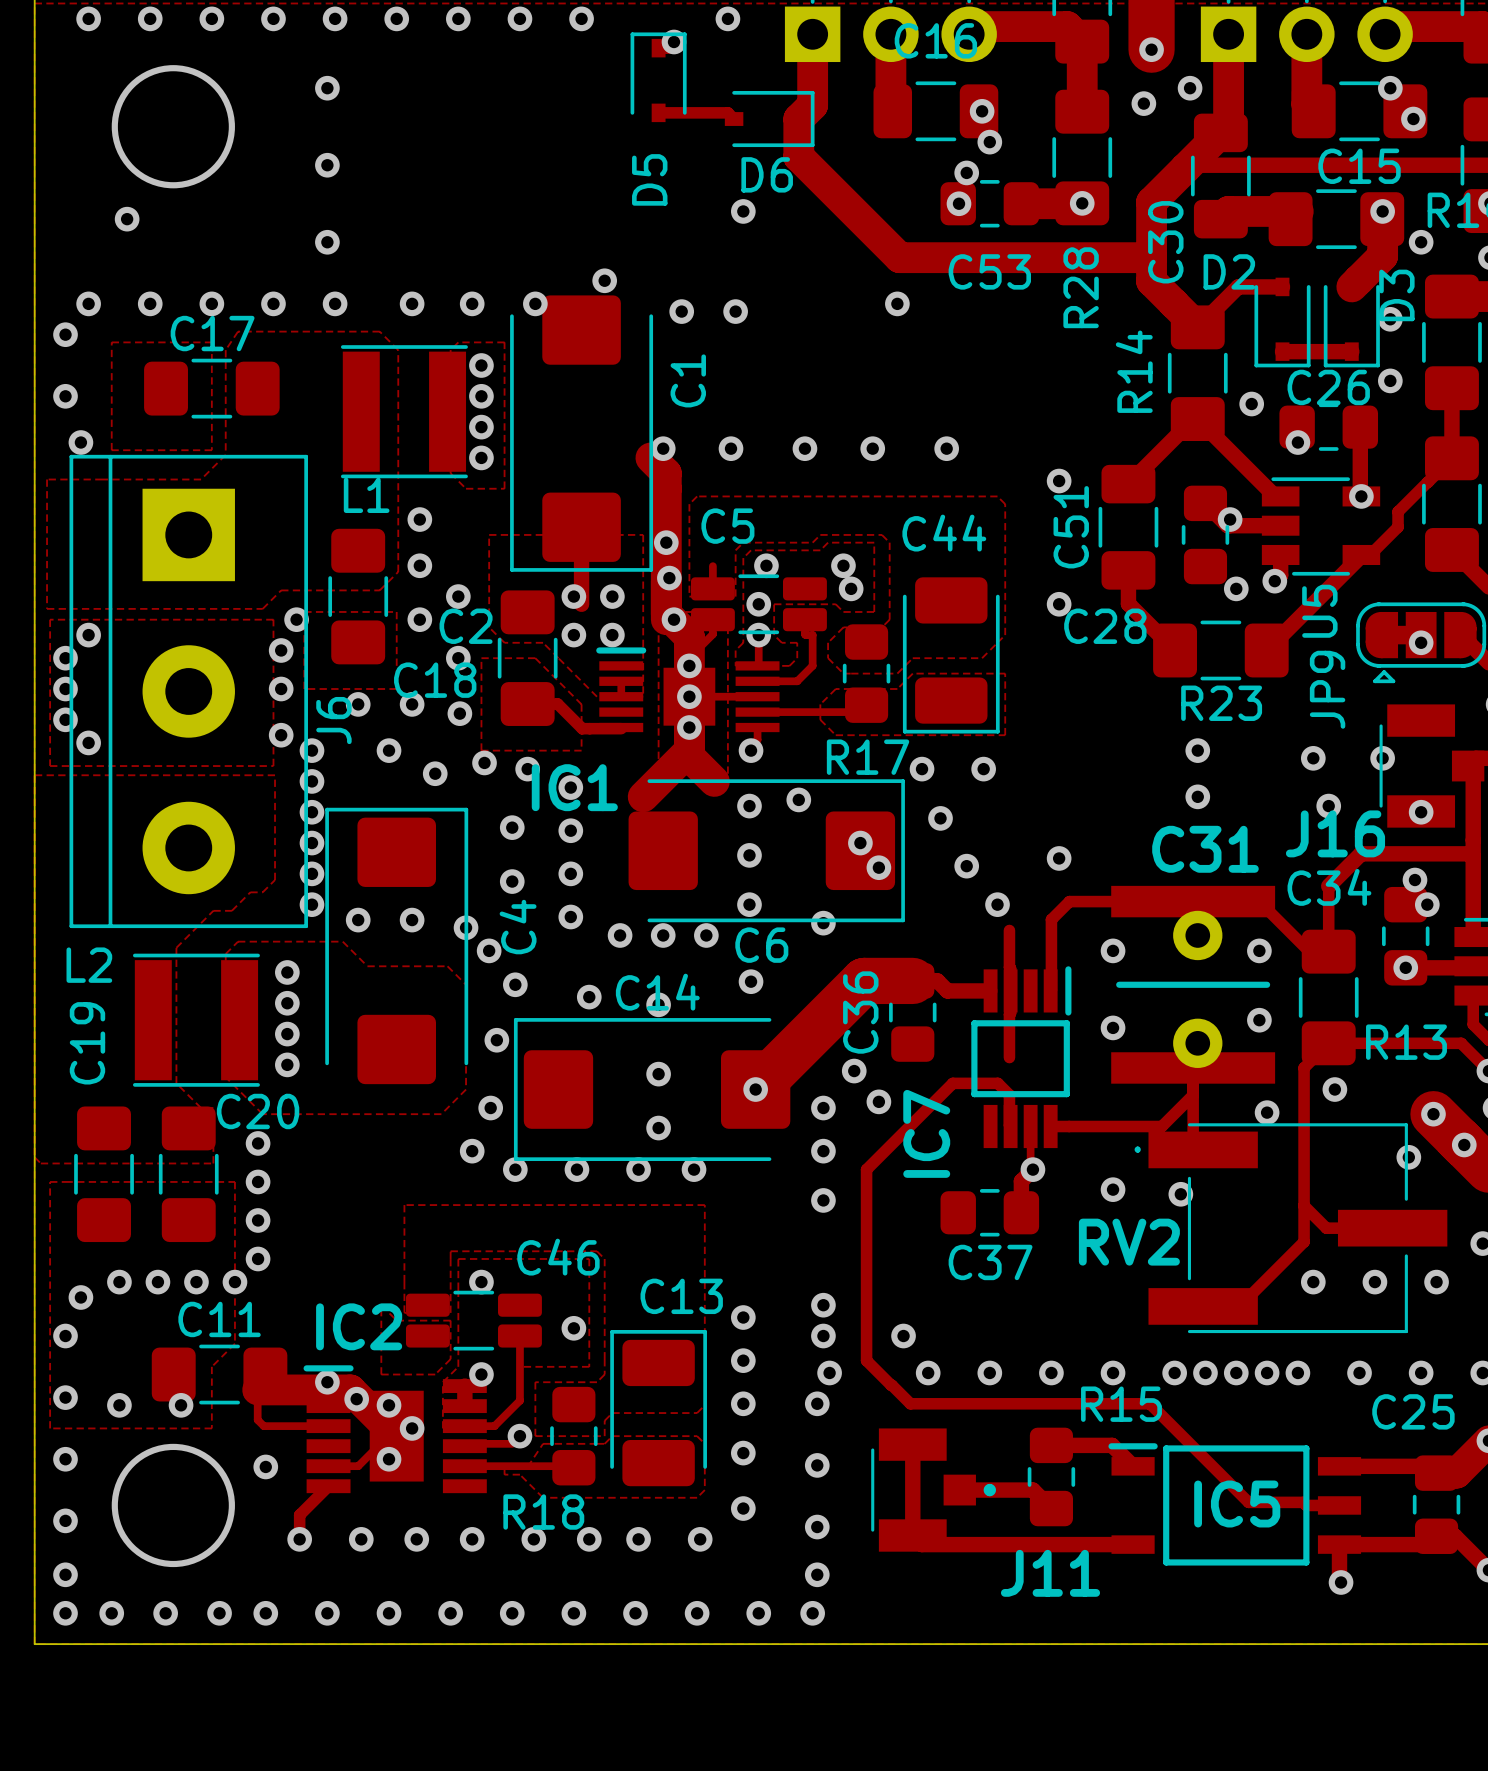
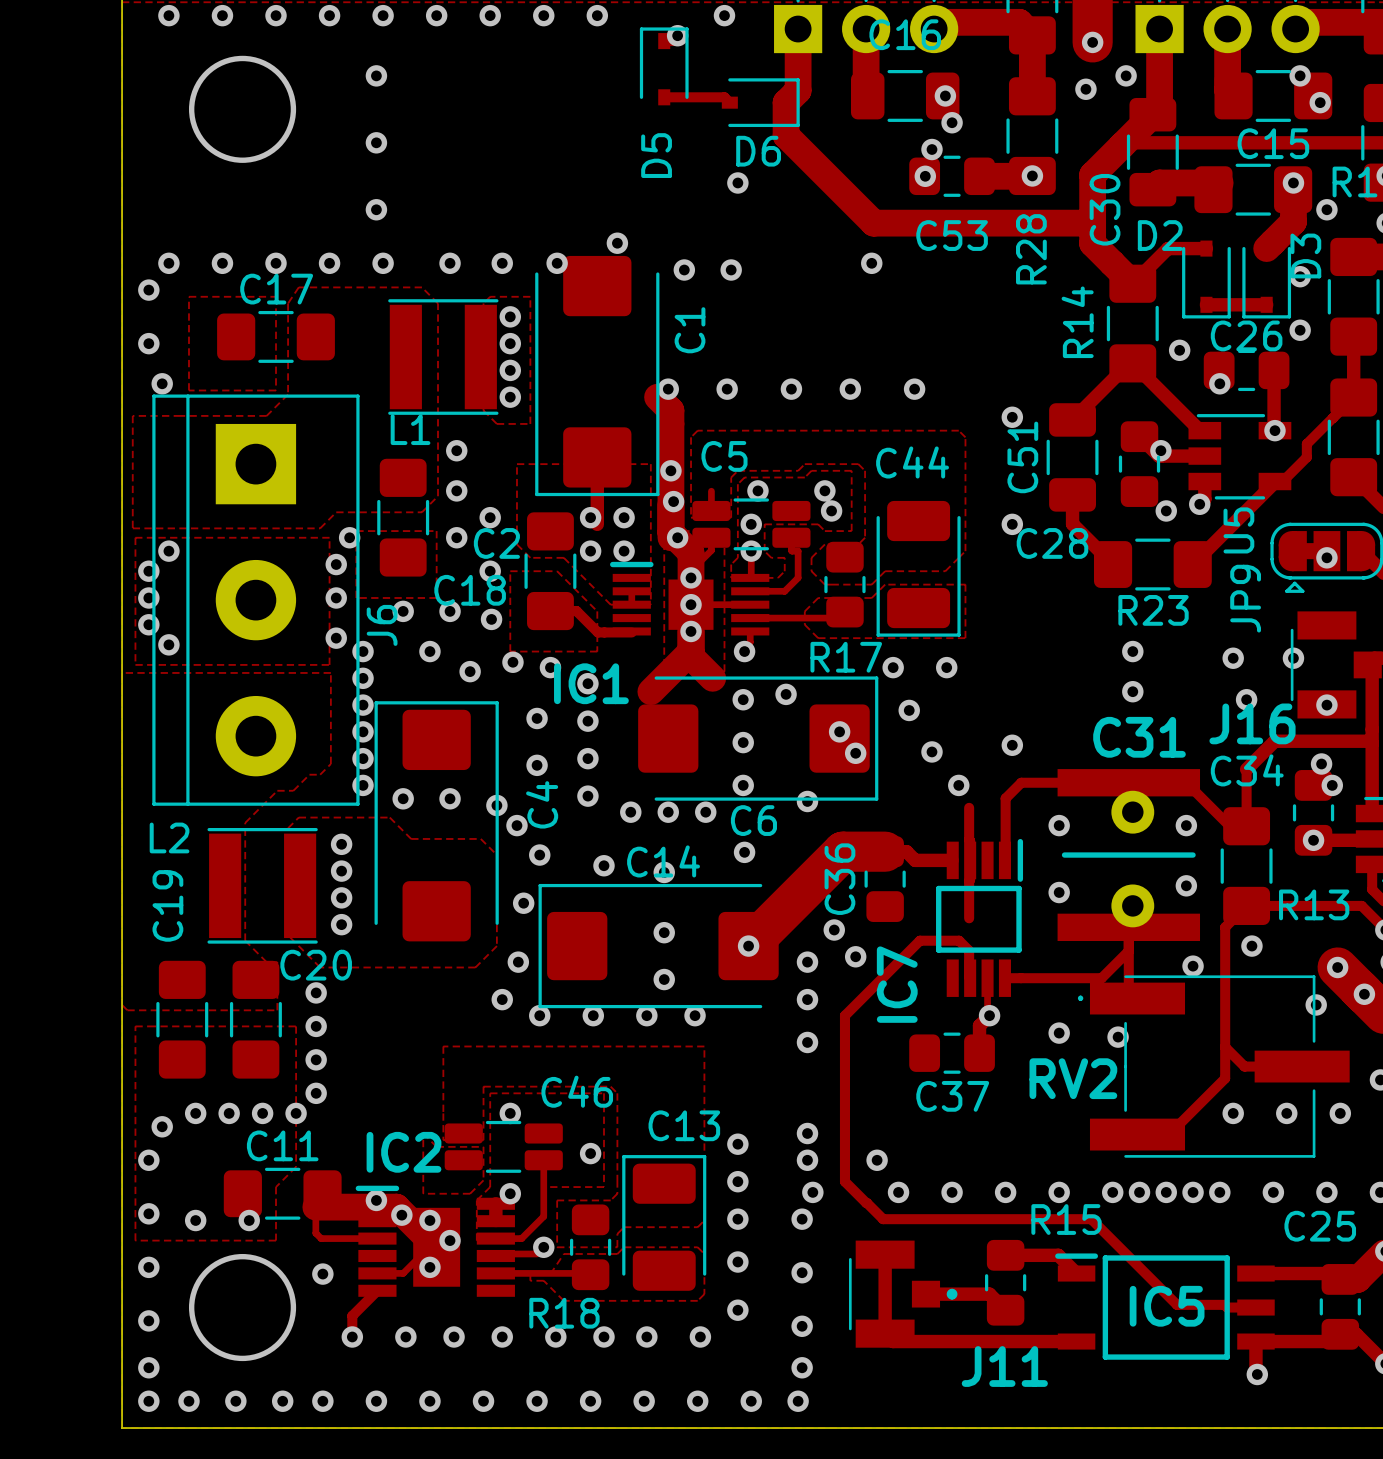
via: (127, 219) -> none

